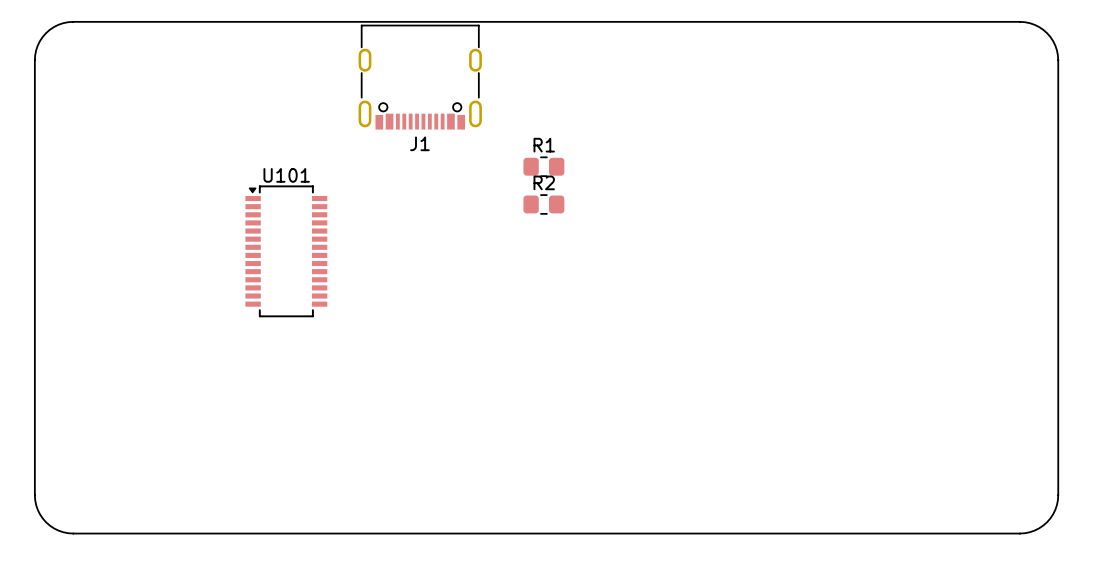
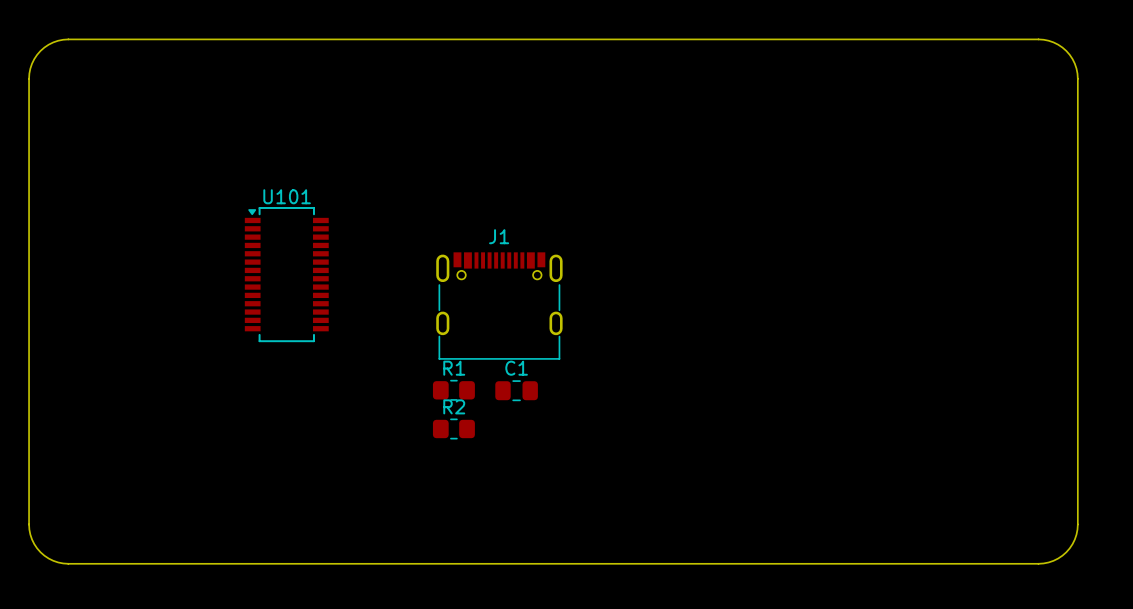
J1 rotation: 0° (420, 77) -> 180° (499, 306)
J1 position: (420, 77) -> (499, 306)
R1 position: (543, 166) -> (453, 390)
R2 position: (543, 204) -> (453, 428)
C1: none -> (516, 390)

